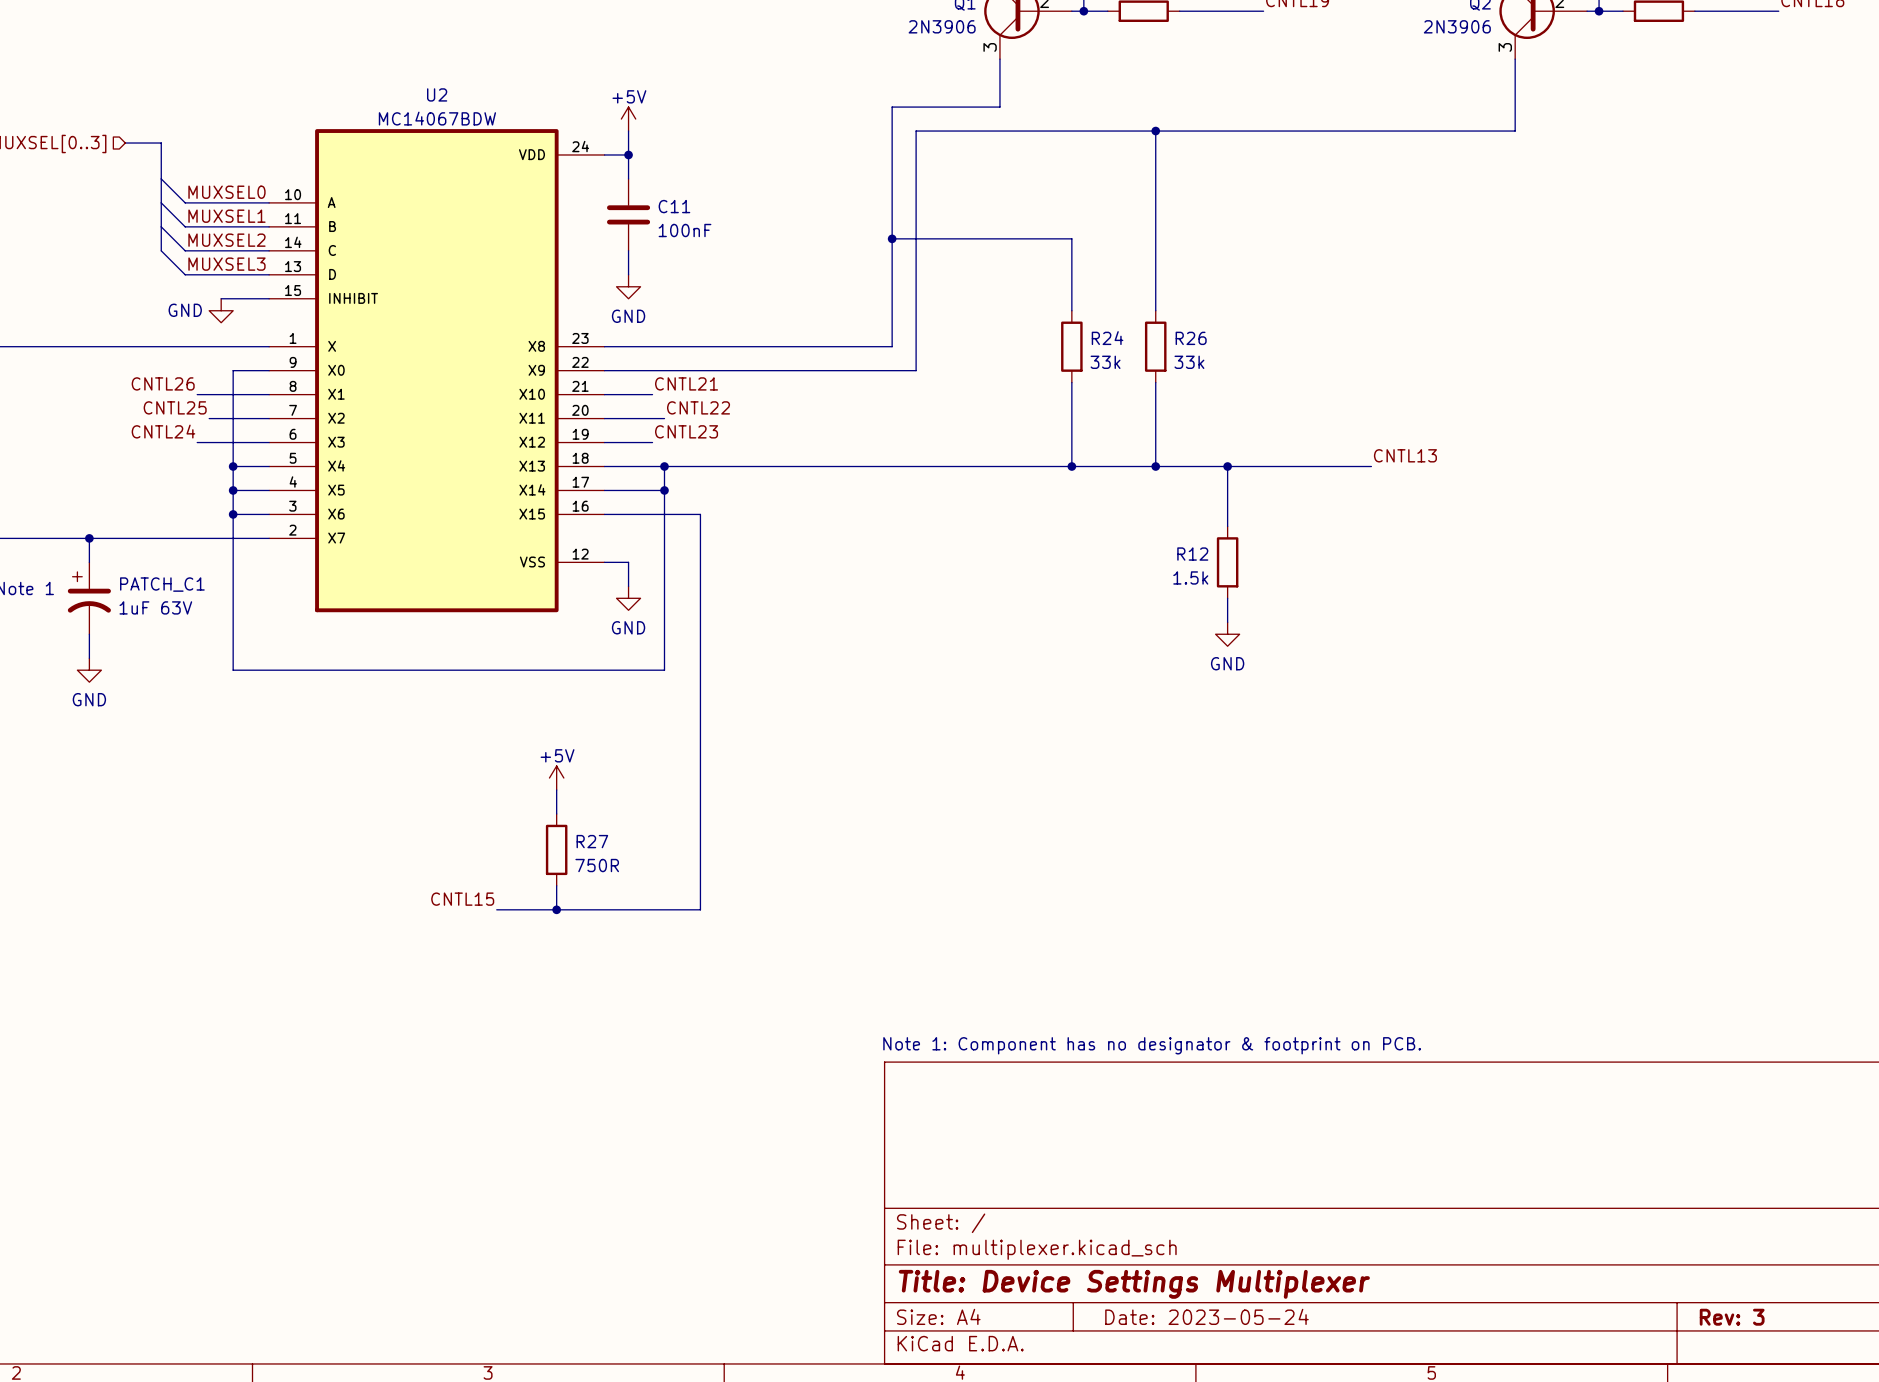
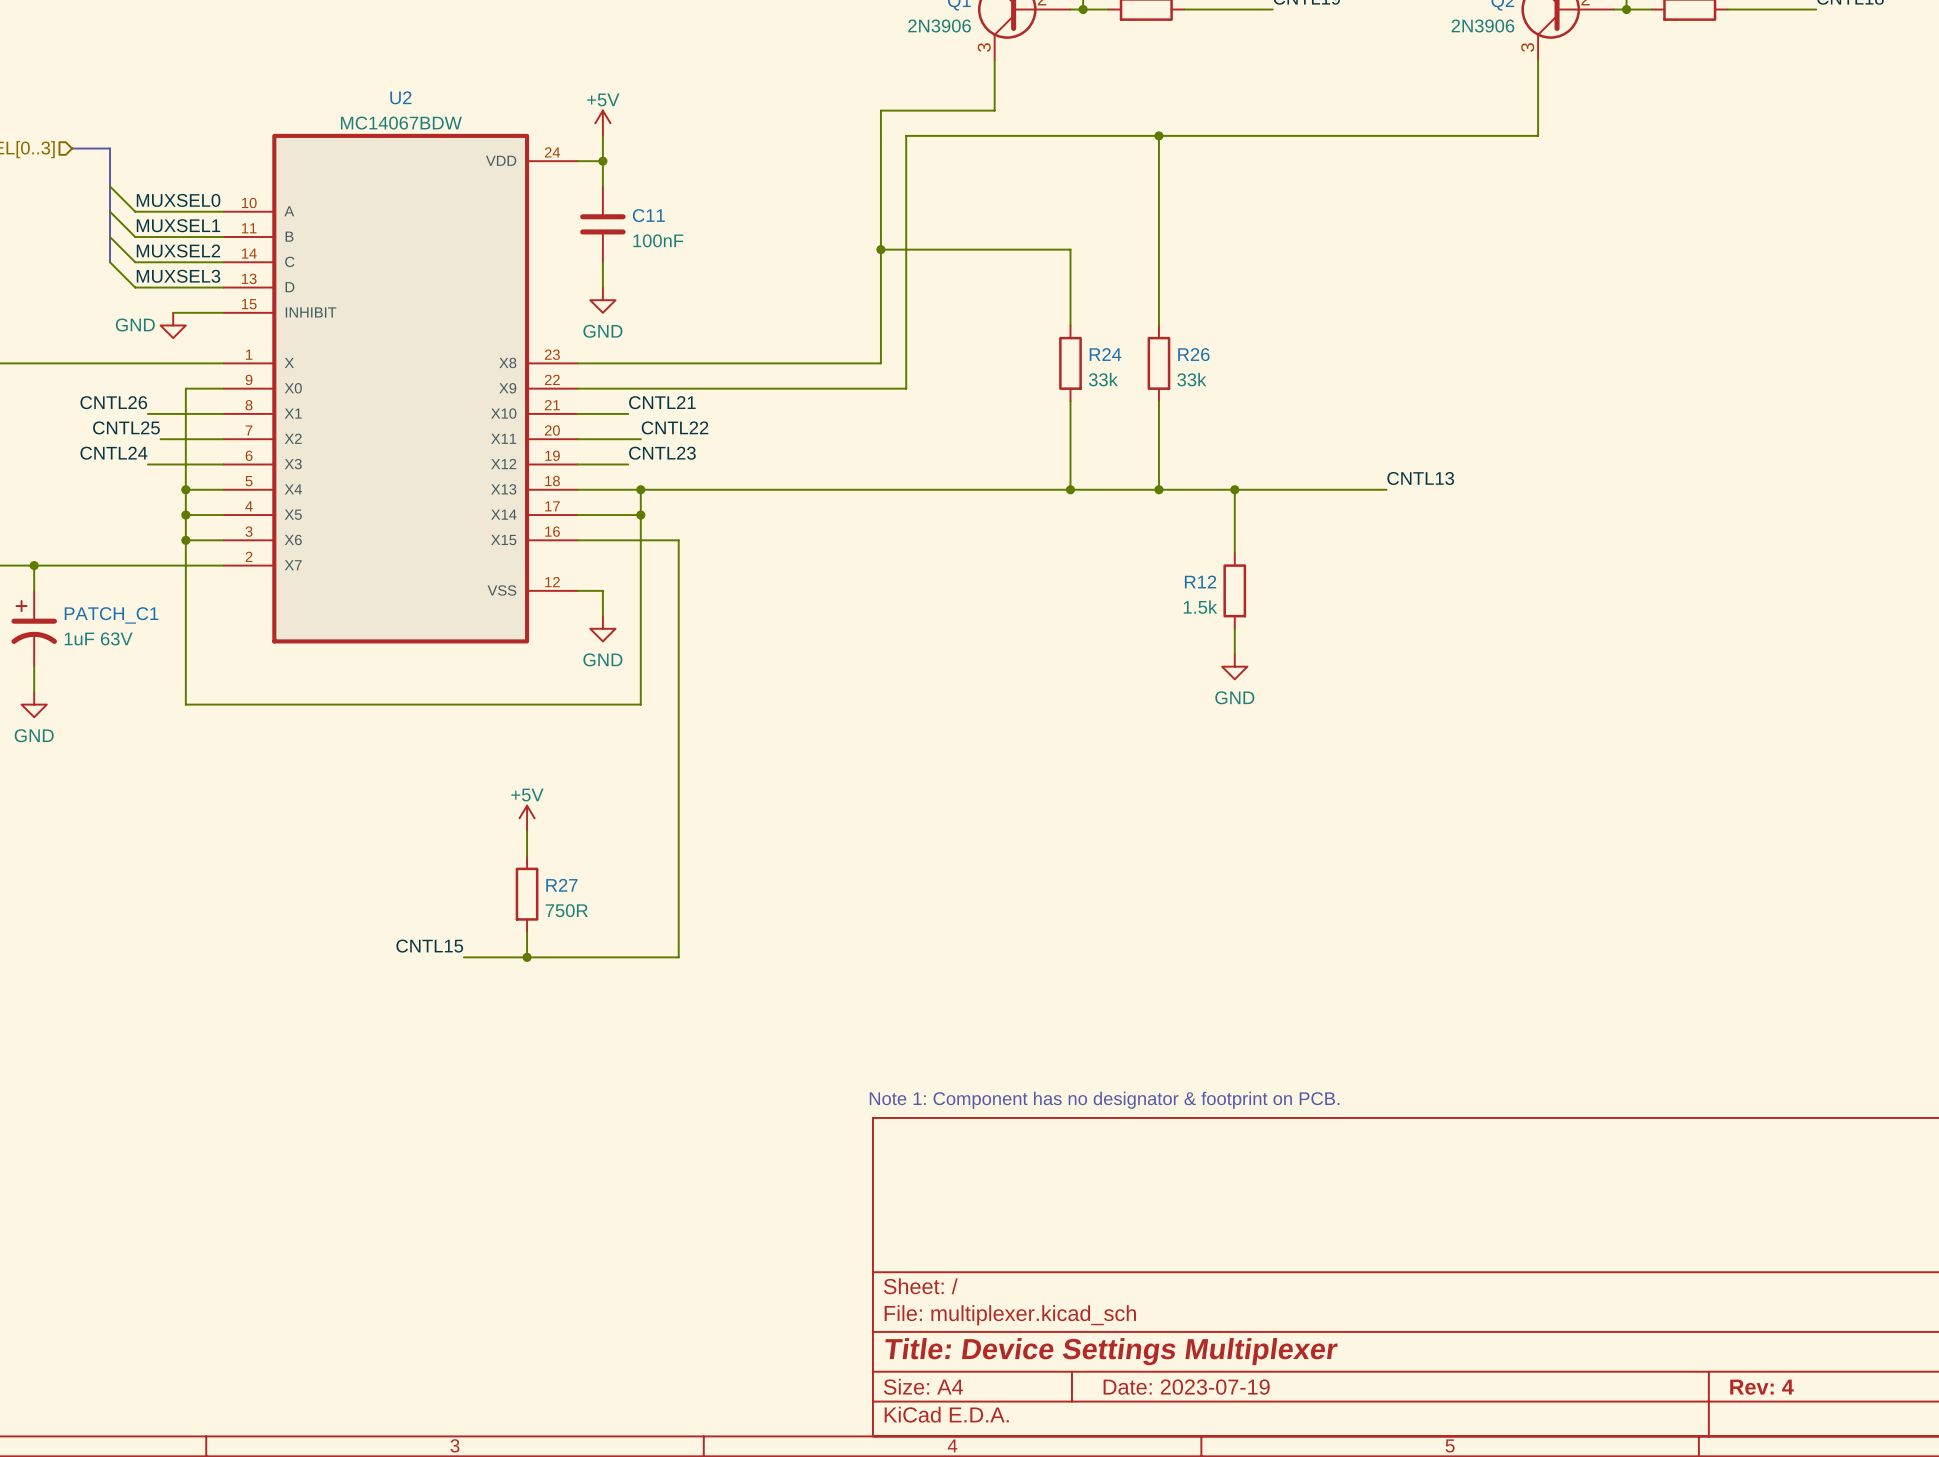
title block: Date: 2023-05-24 (1206, 1316) -> Date: 2023-07-19 (1186, 1387)
title block: Rev: 3 (1732, 1317) -> Rev: 4 (1761, 1387)

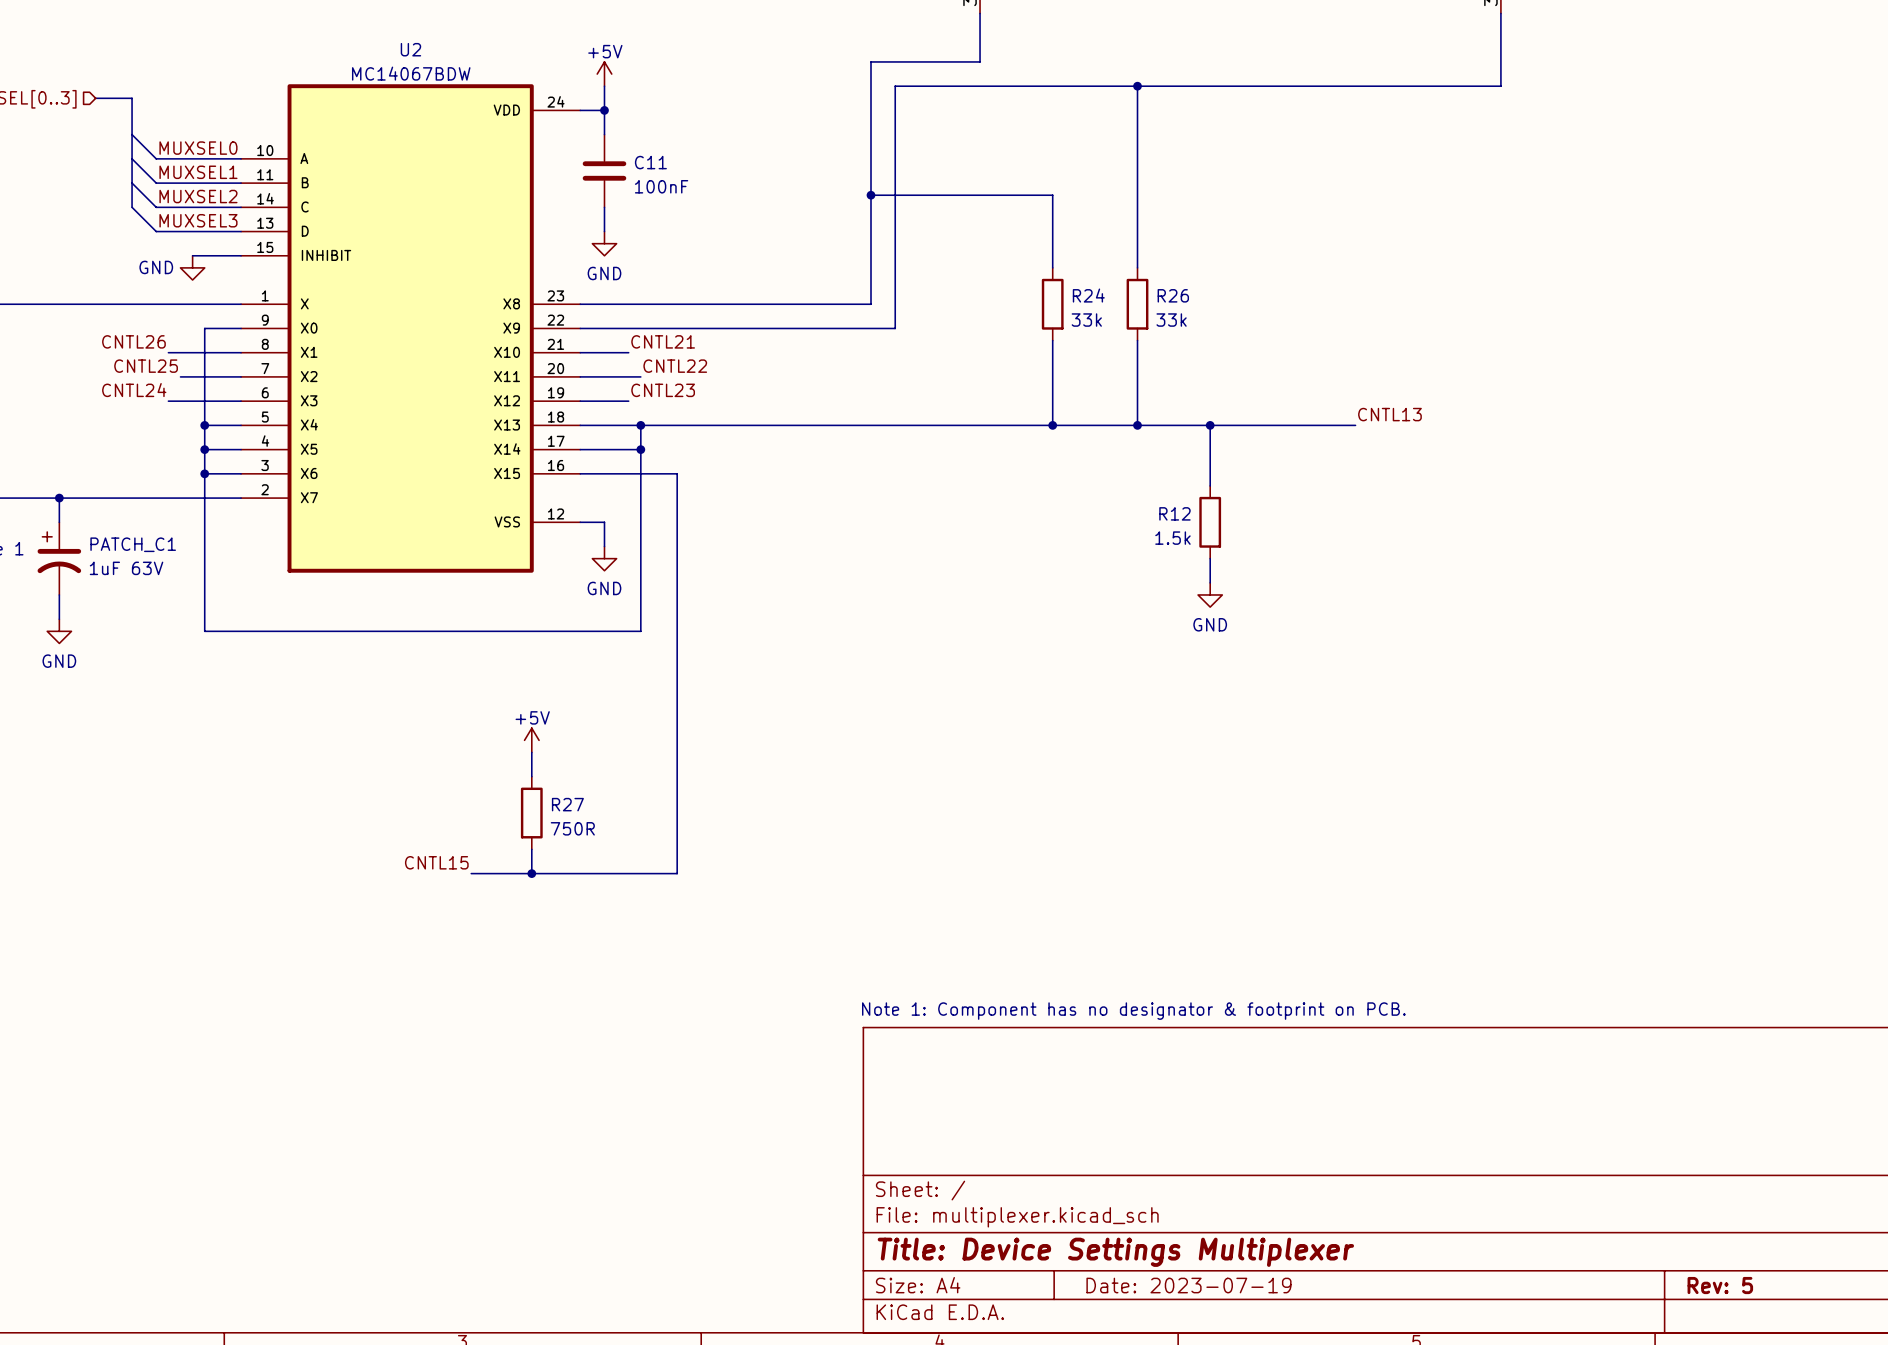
title block: Rev: 4 (1761, 1387) -> Rev: 5 (1720, 1285)

